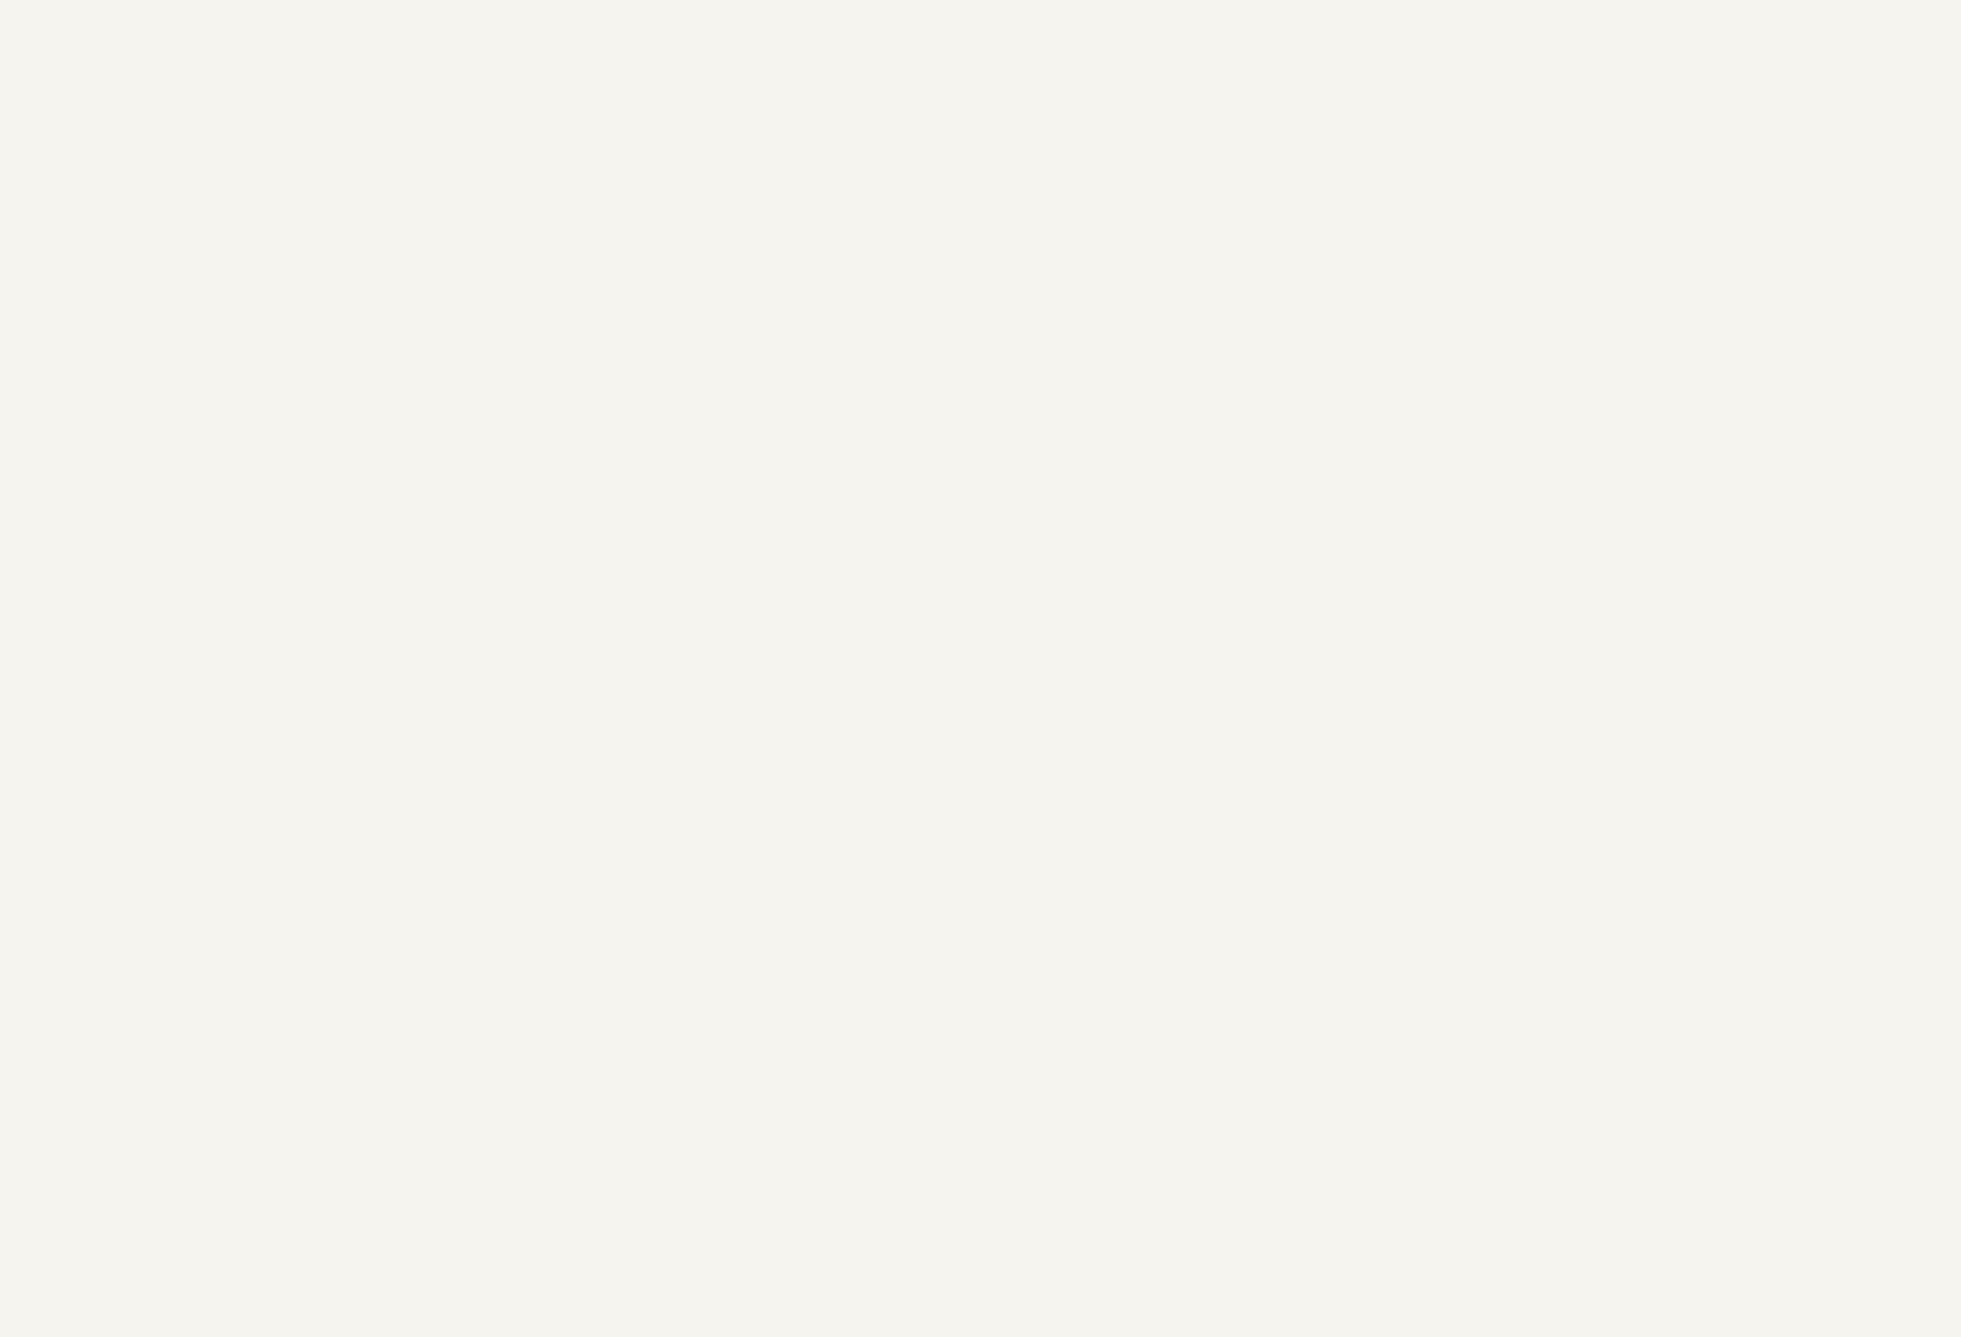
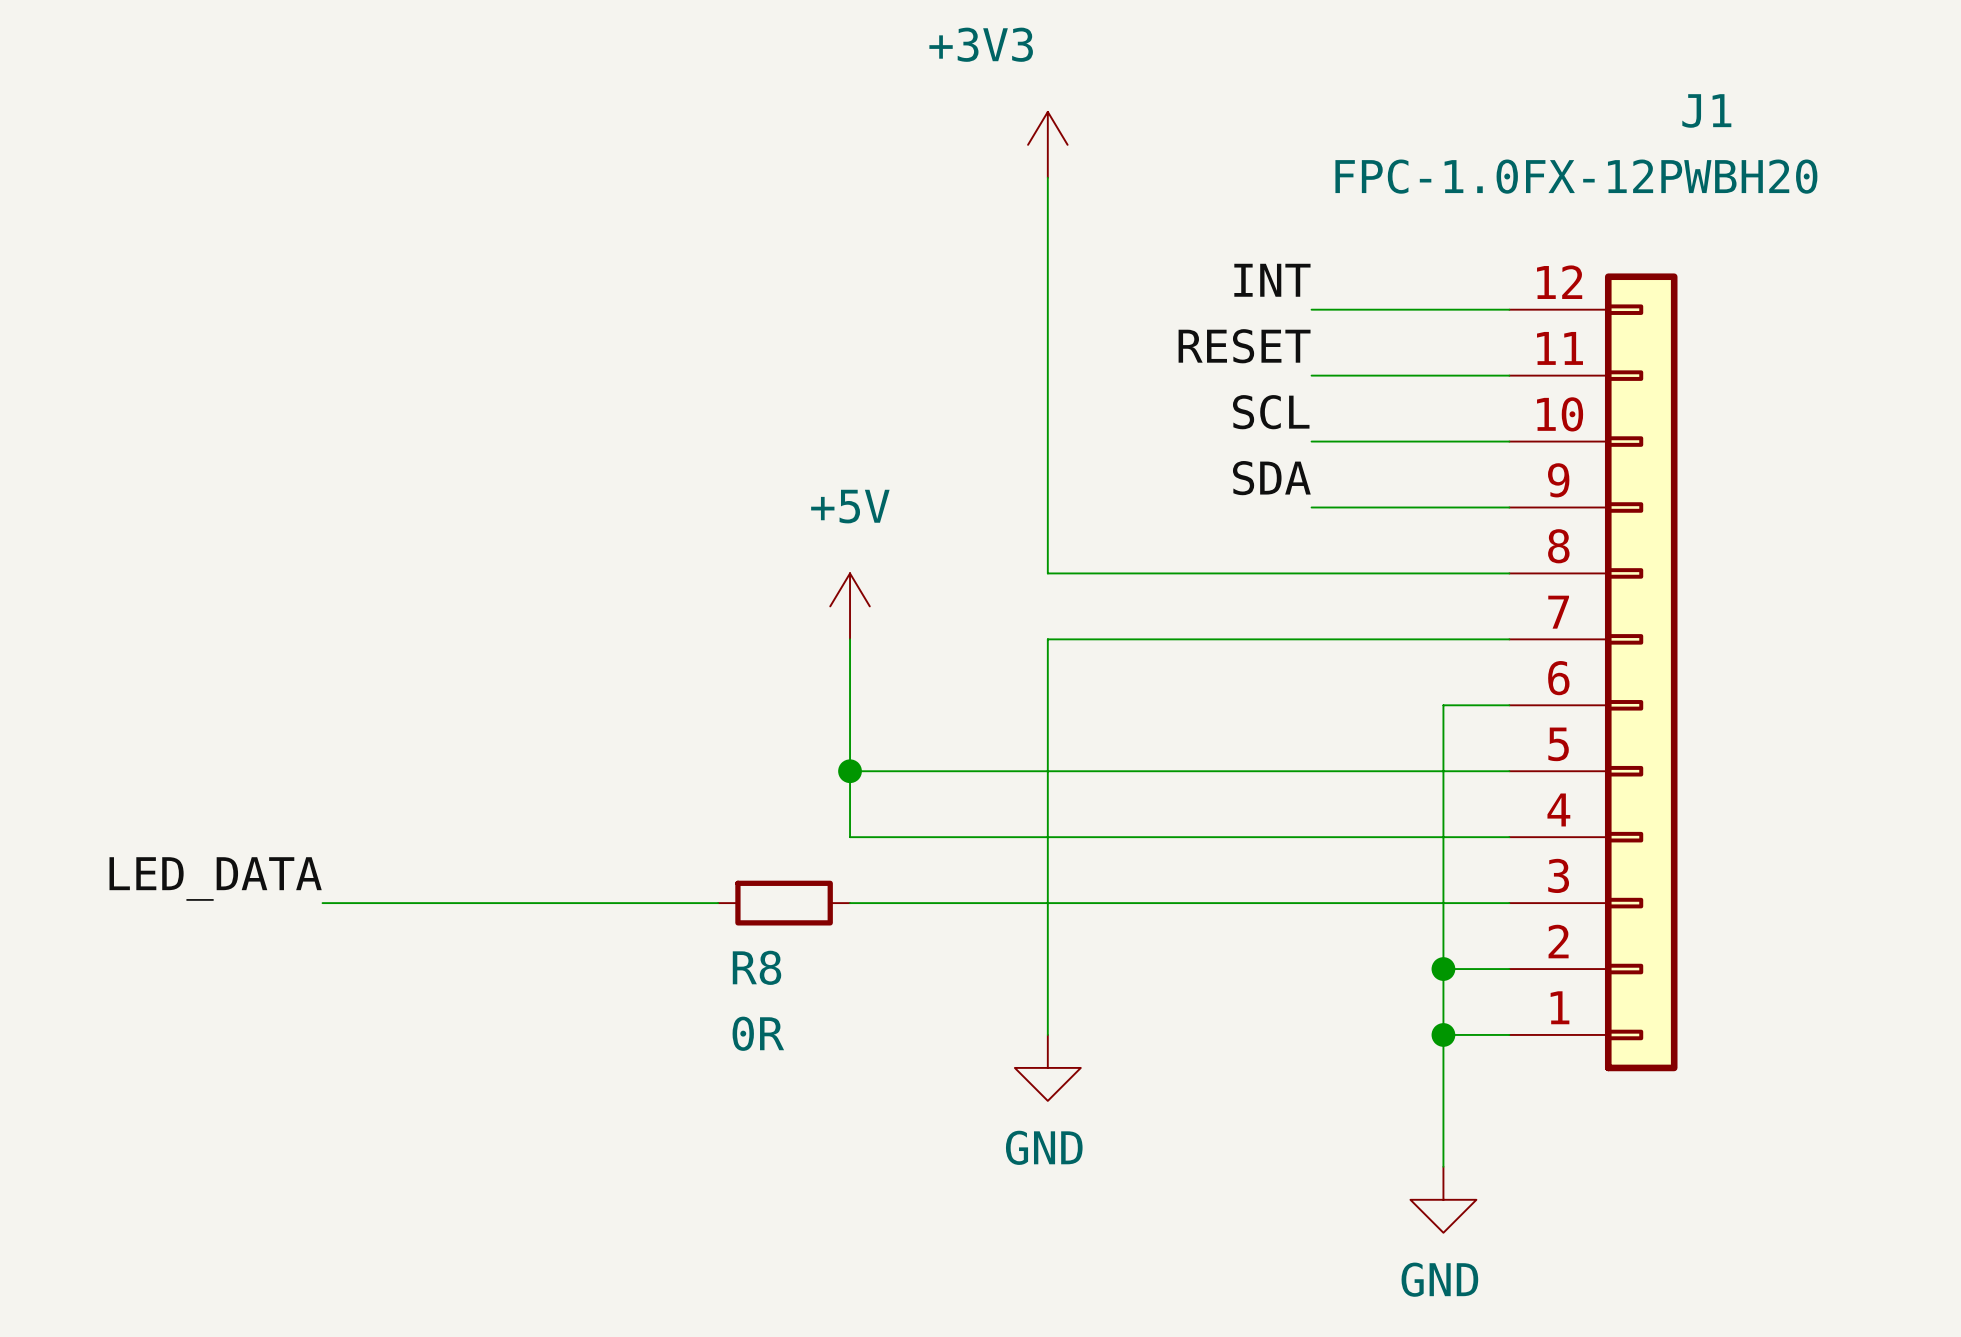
power symbol: none -> +3V3 (1047, 144)
wire: none -> (1047, 177) (1047, 573) (1509, 573)
label: none -> INT (1272, 280)
wire: none -> (1311, 309) (1509, 309)
label: none -> RESET (1244, 346)
wire: none -> (1311, 375) (1509, 375)
label: none -> SCL (1271, 412)
wire: none -> (1311, 441) (1509, 441)
label: none -> SDA (1271, 478)
wire: none -> (1311, 507) (1509, 507)
power symbol: none -> +5V (850, 606)
wire: none -> (850, 639) (850, 837) (1509, 837)
wire: none -> (1509, 639) (1047, 639) (1047, 1034)
J1: none -> FPC-1.0FX-12PWBH20 (1593, 672)
wire: none -> (1509, 705) (1443, 705) (1443, 1166)
wire: none -> (850, 771) (1509, 771)
junction: none -> (850, 771)
label: none -> LED_DATA (215, 879)
wire: none -> (322, 903) (718, 903)
R8: none -> 0R (784, 903)
wire: none -> (850, 903) (1509, 903)
wire: none -> (1443, 969) (1509, 969)
junction: none -> (1443, 969)
wire: none -> (1443, 1034) (1509, 1034)
junction: none -> (1443, 1034)
power symbol: none -> GND (1047, 1067)
power symbol: none -> GND (1443, 1199)

